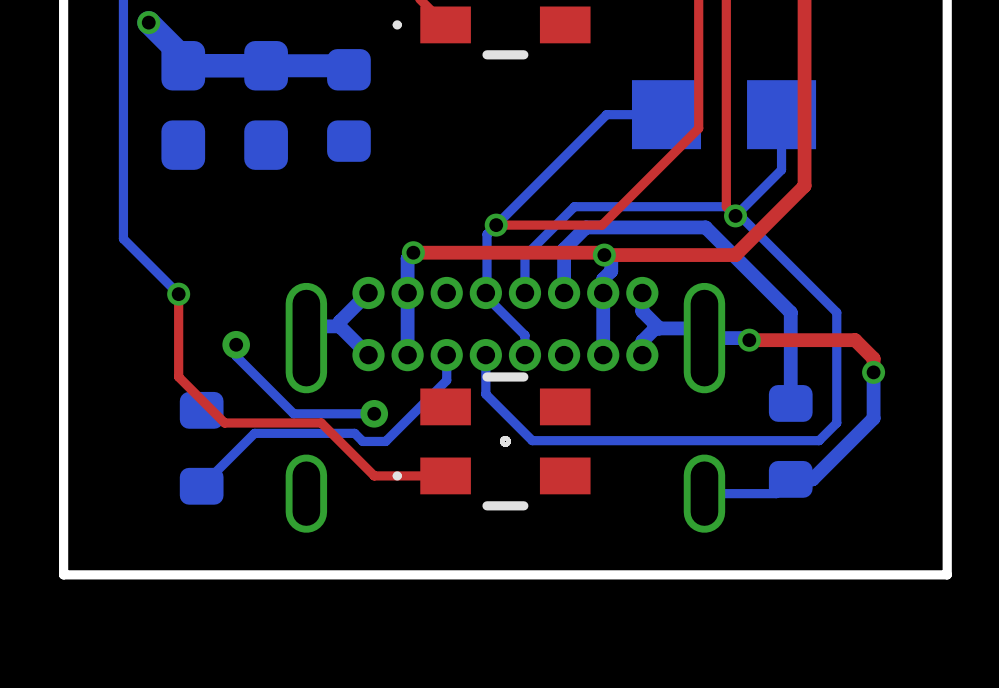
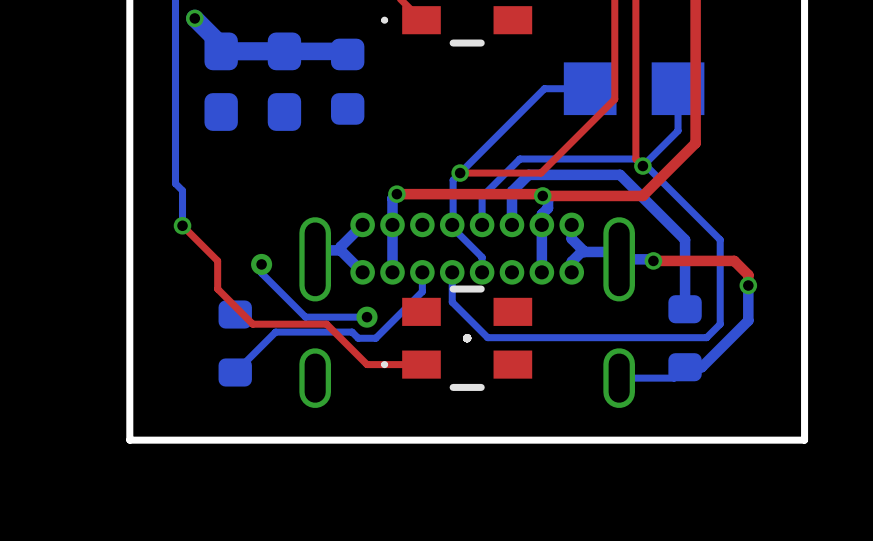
bottom track: (132, 248) (178, 294) -> (182, 190) (182, 225)
top track: (178, 294) (178, 340) -> (182, 225) (217, 260)
via position: (178, 294) -> (182, 225)

